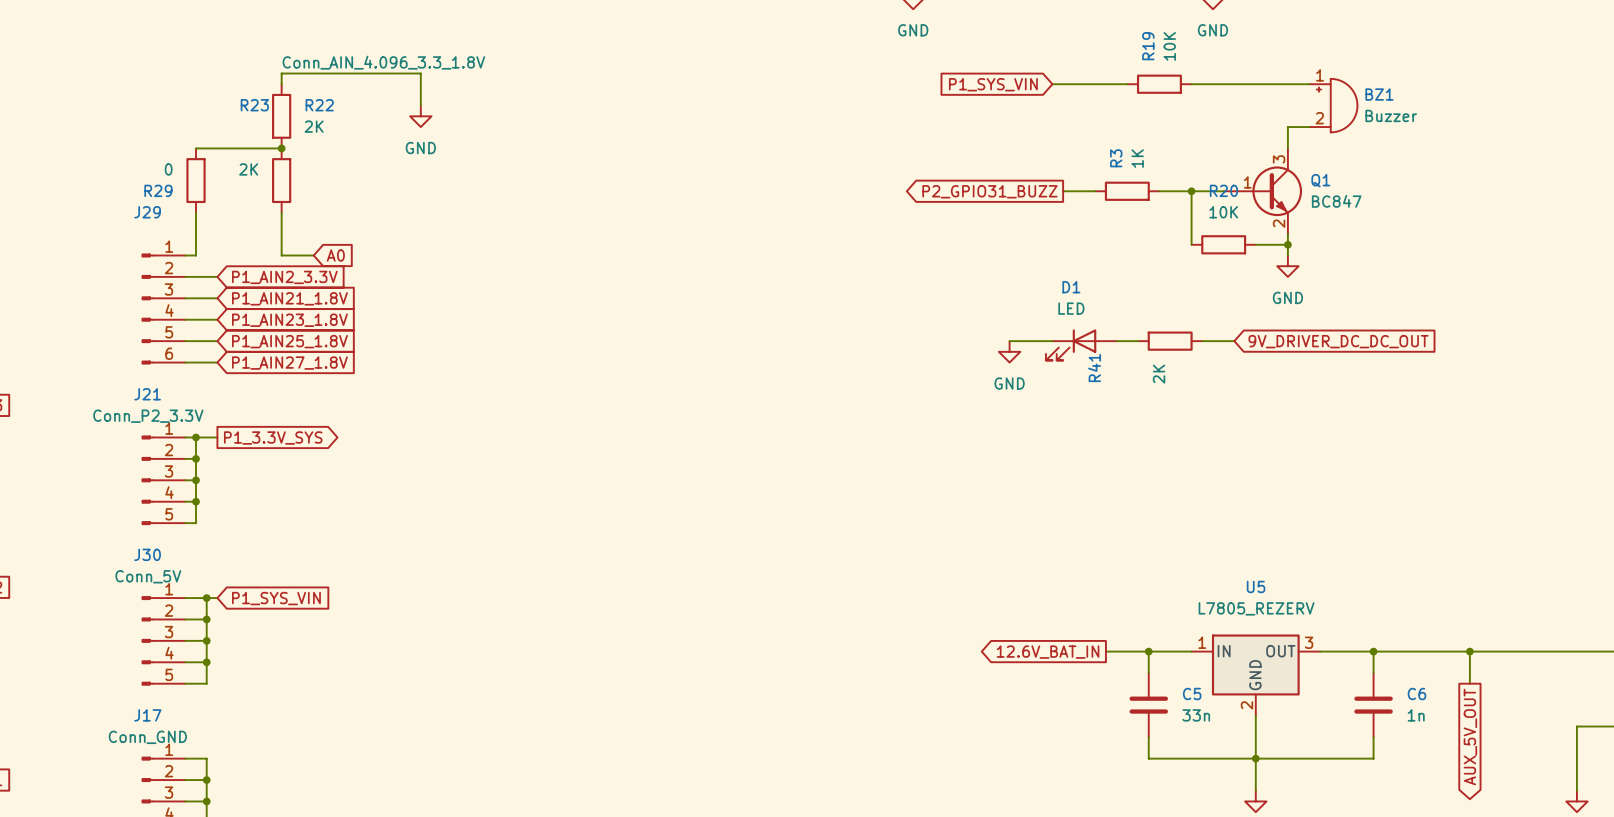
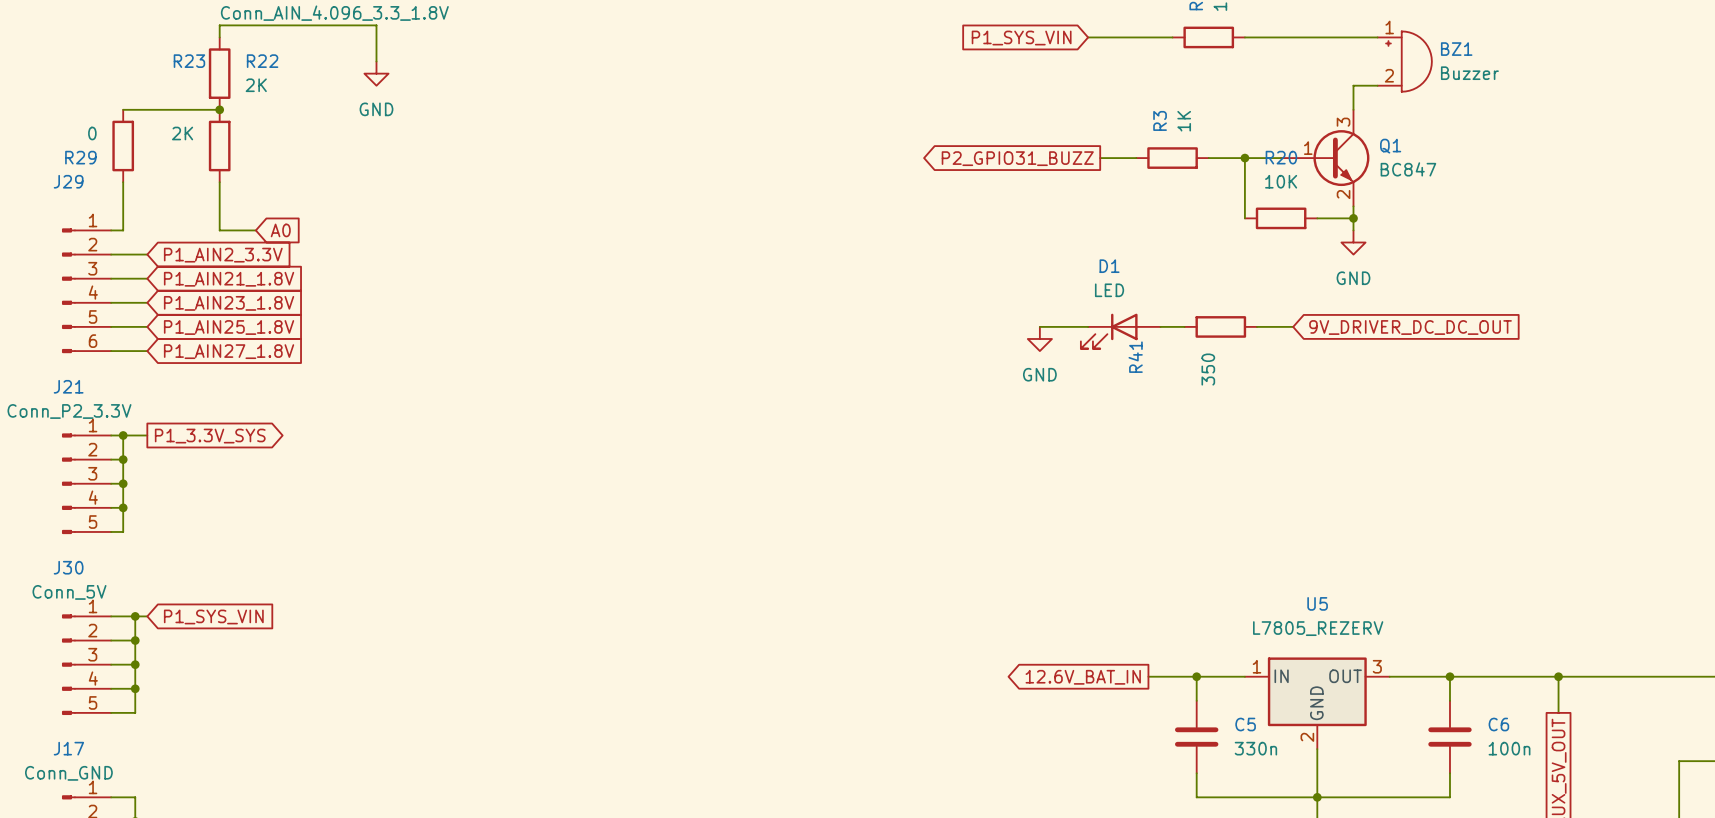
R41 value: 2K (1159, 374) -> 350 (1208, 369)
C5 value: 33n (1196, 715) -> 330n (1255, 748)
C6 value: 1n (1416, 715) -> 100n (1509, 748)

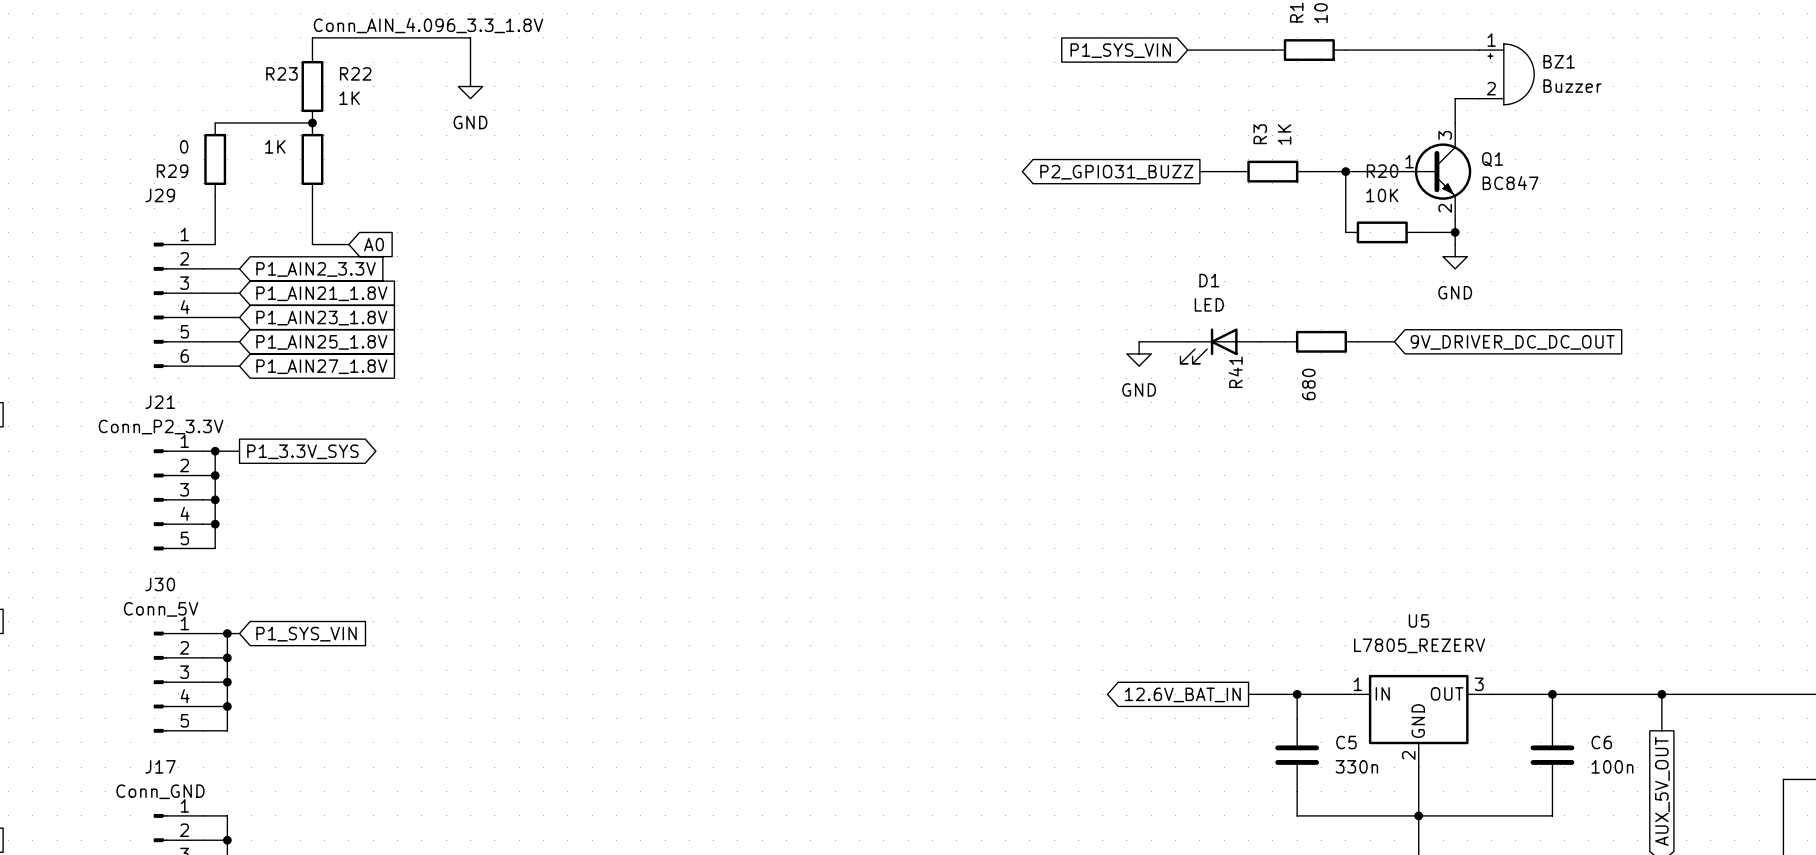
R22 value: 2K (256, 85) -> 1K (349, 98)
R23 value: 2K (182, 133) -> 1K (275, 146)
R41 value: 350 (1208, 369) -> 680 (1308, 384)

